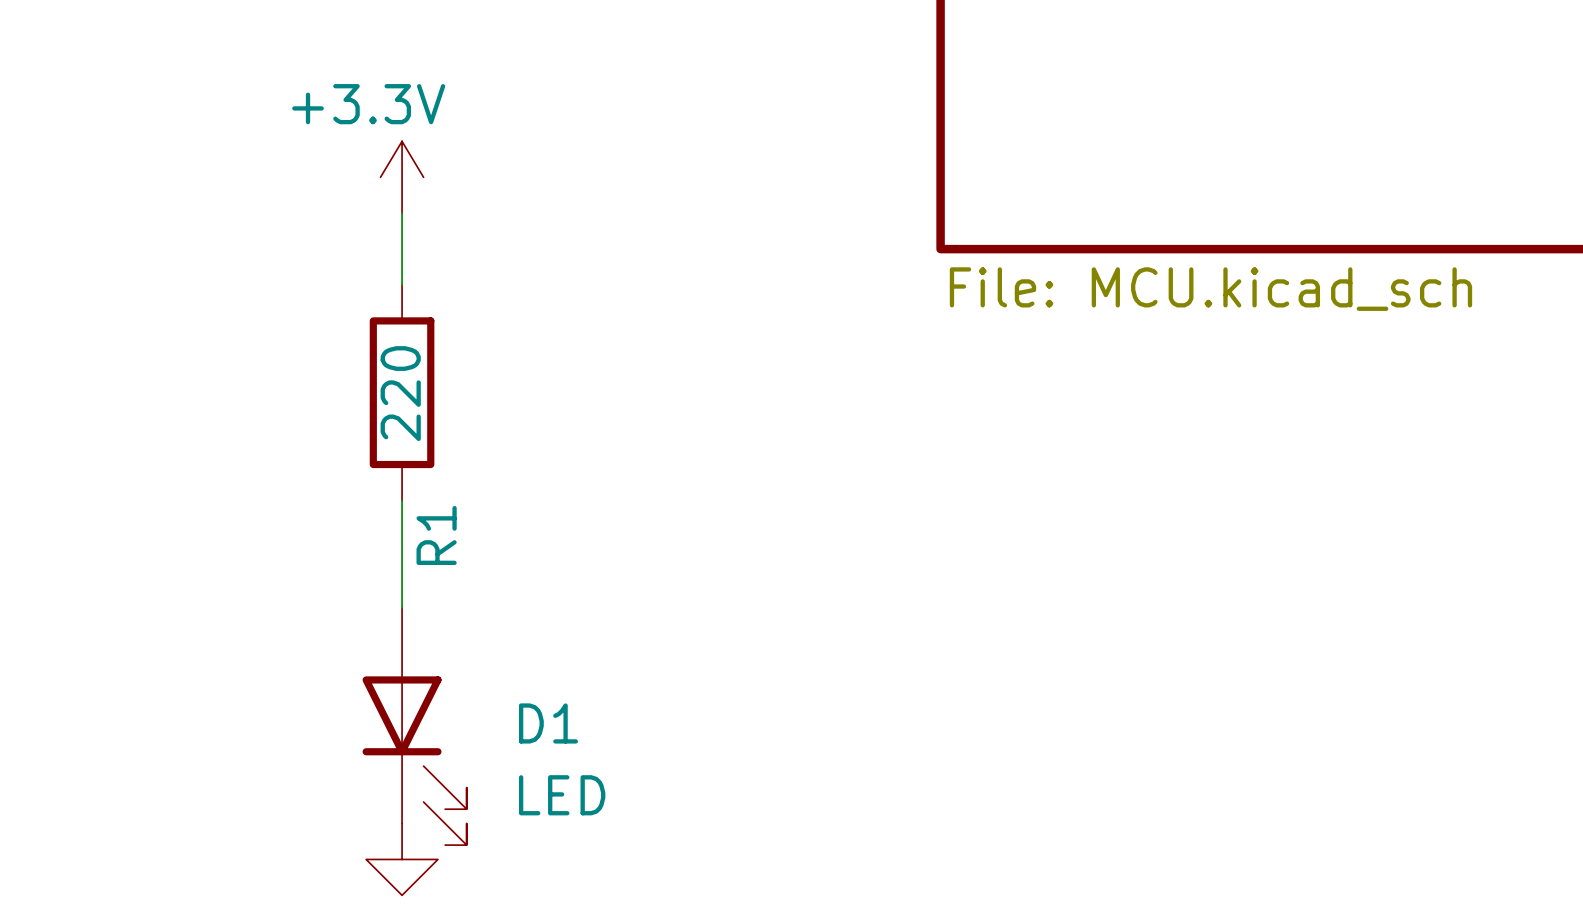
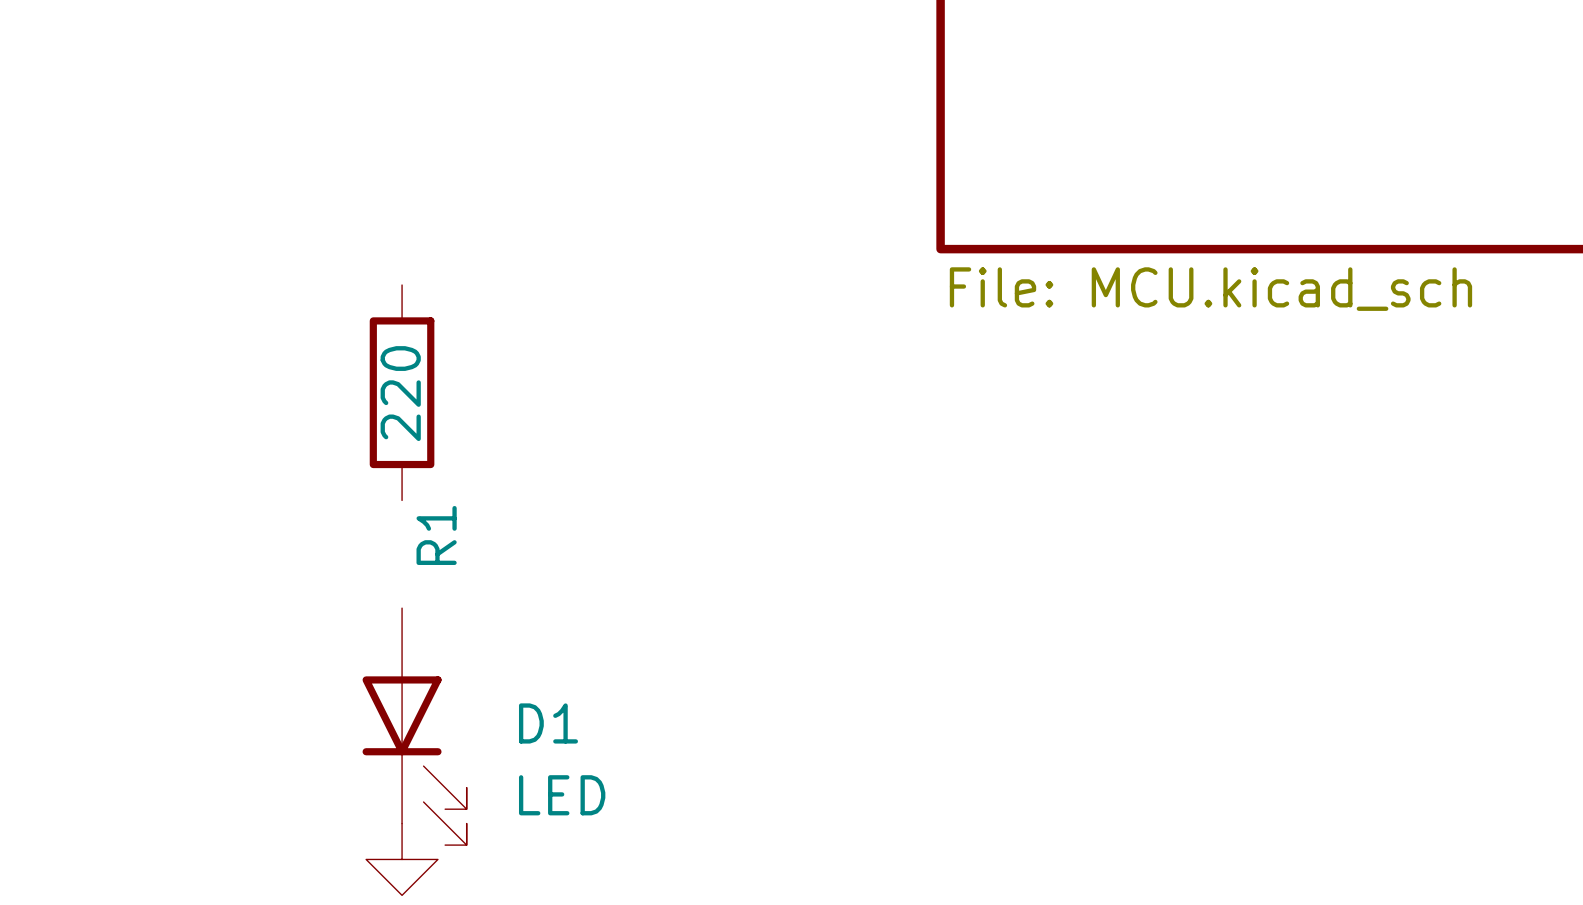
power symbol: +3.3V (402, 177) -> none
wire: (402, 213) (402, 285) -> none
wire: (402, 500) (402, 608) -> none

